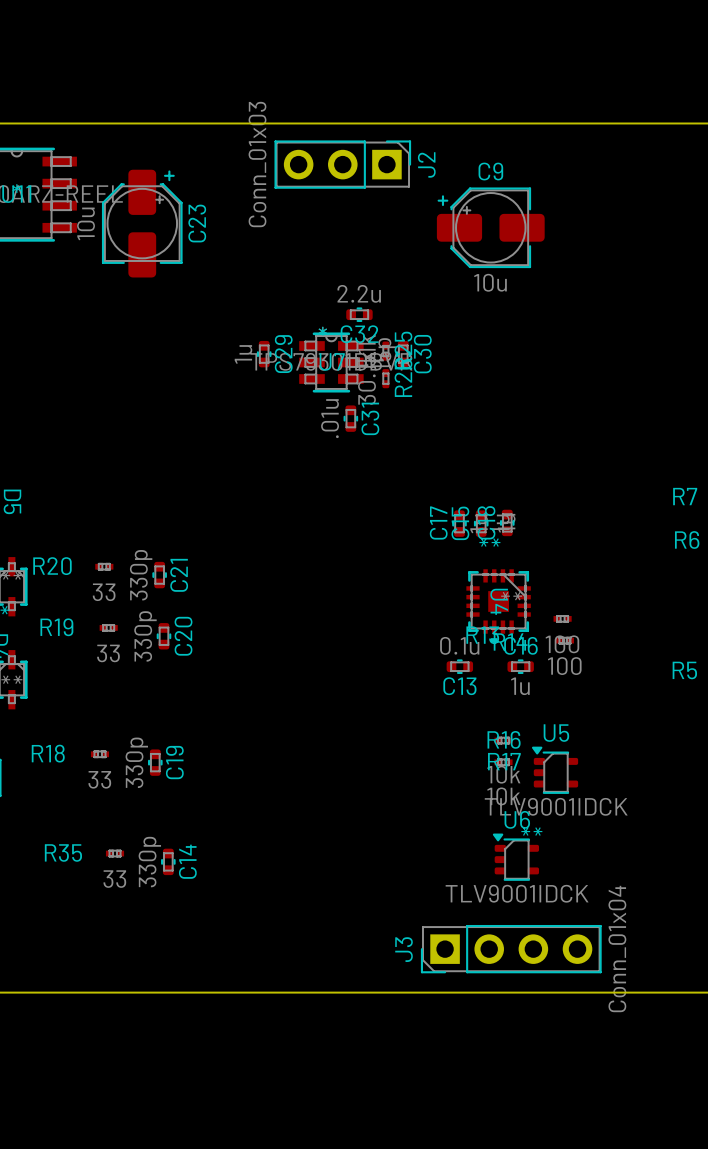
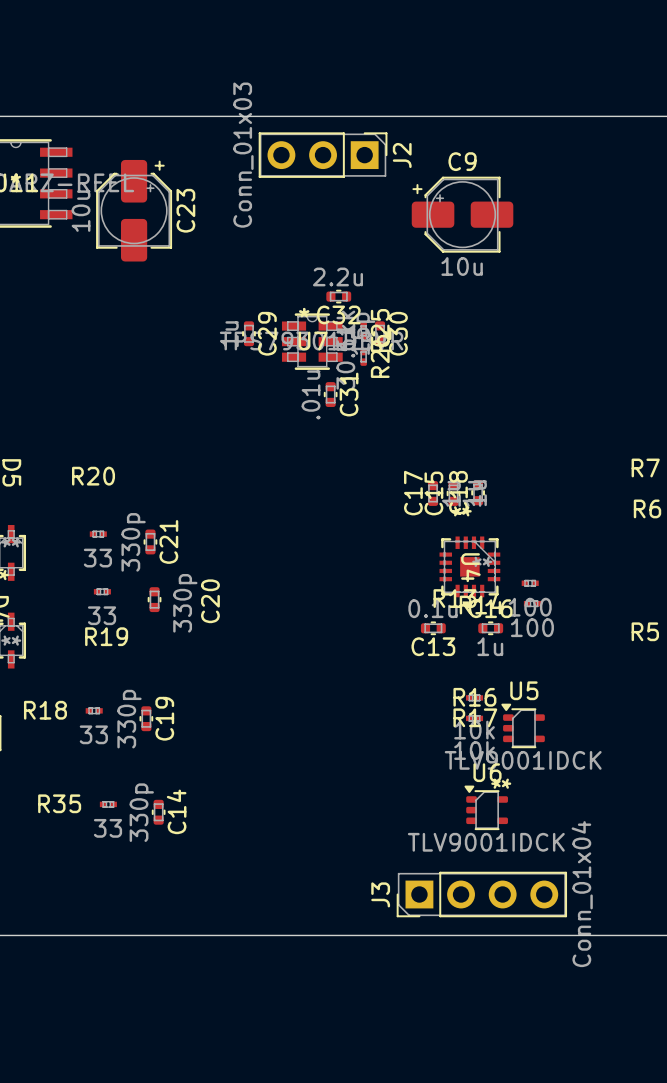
R20 name position: R20 (52, 566) -> R20 (93, 476)
R19 name position: R19 (56, 627) -> R19 (106, 636)
C20 value position: 330p (145, 636) -> 330p (185, 603)
C20 name position: C20 (183, 636) -> C20 (210, 601)

